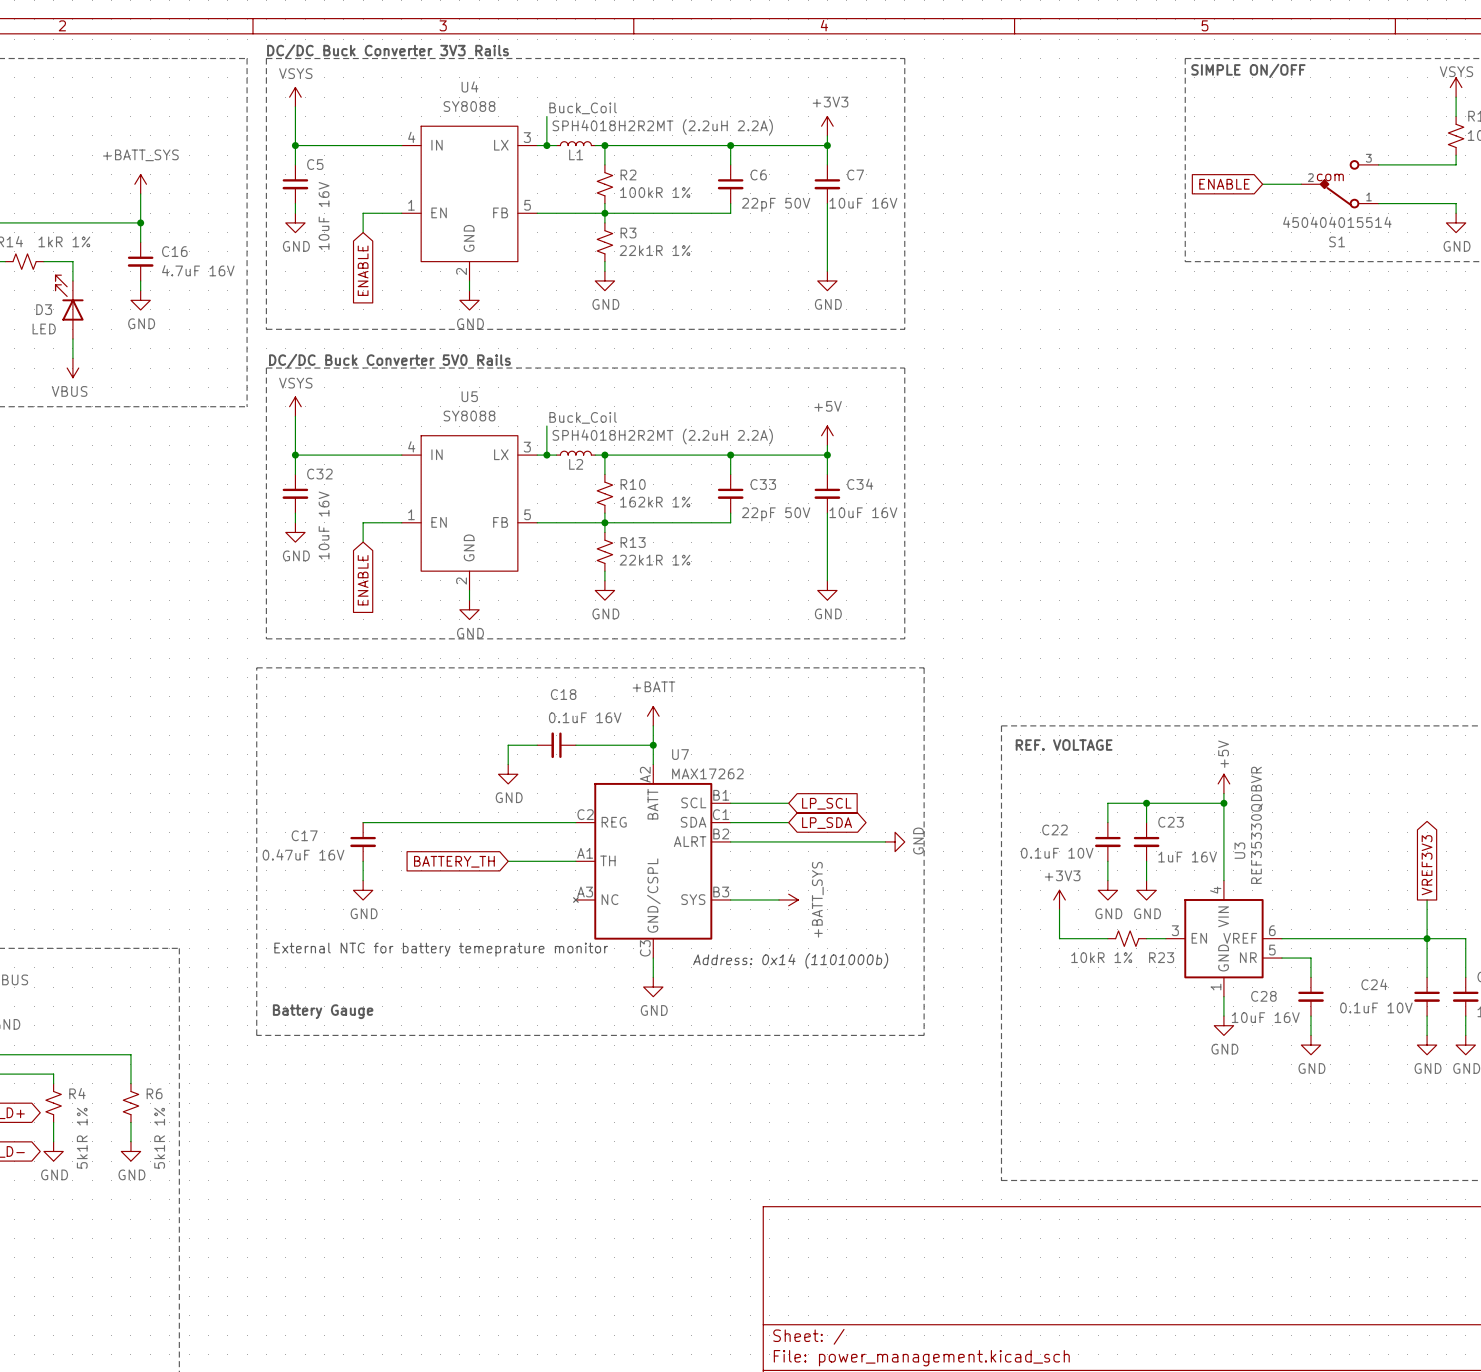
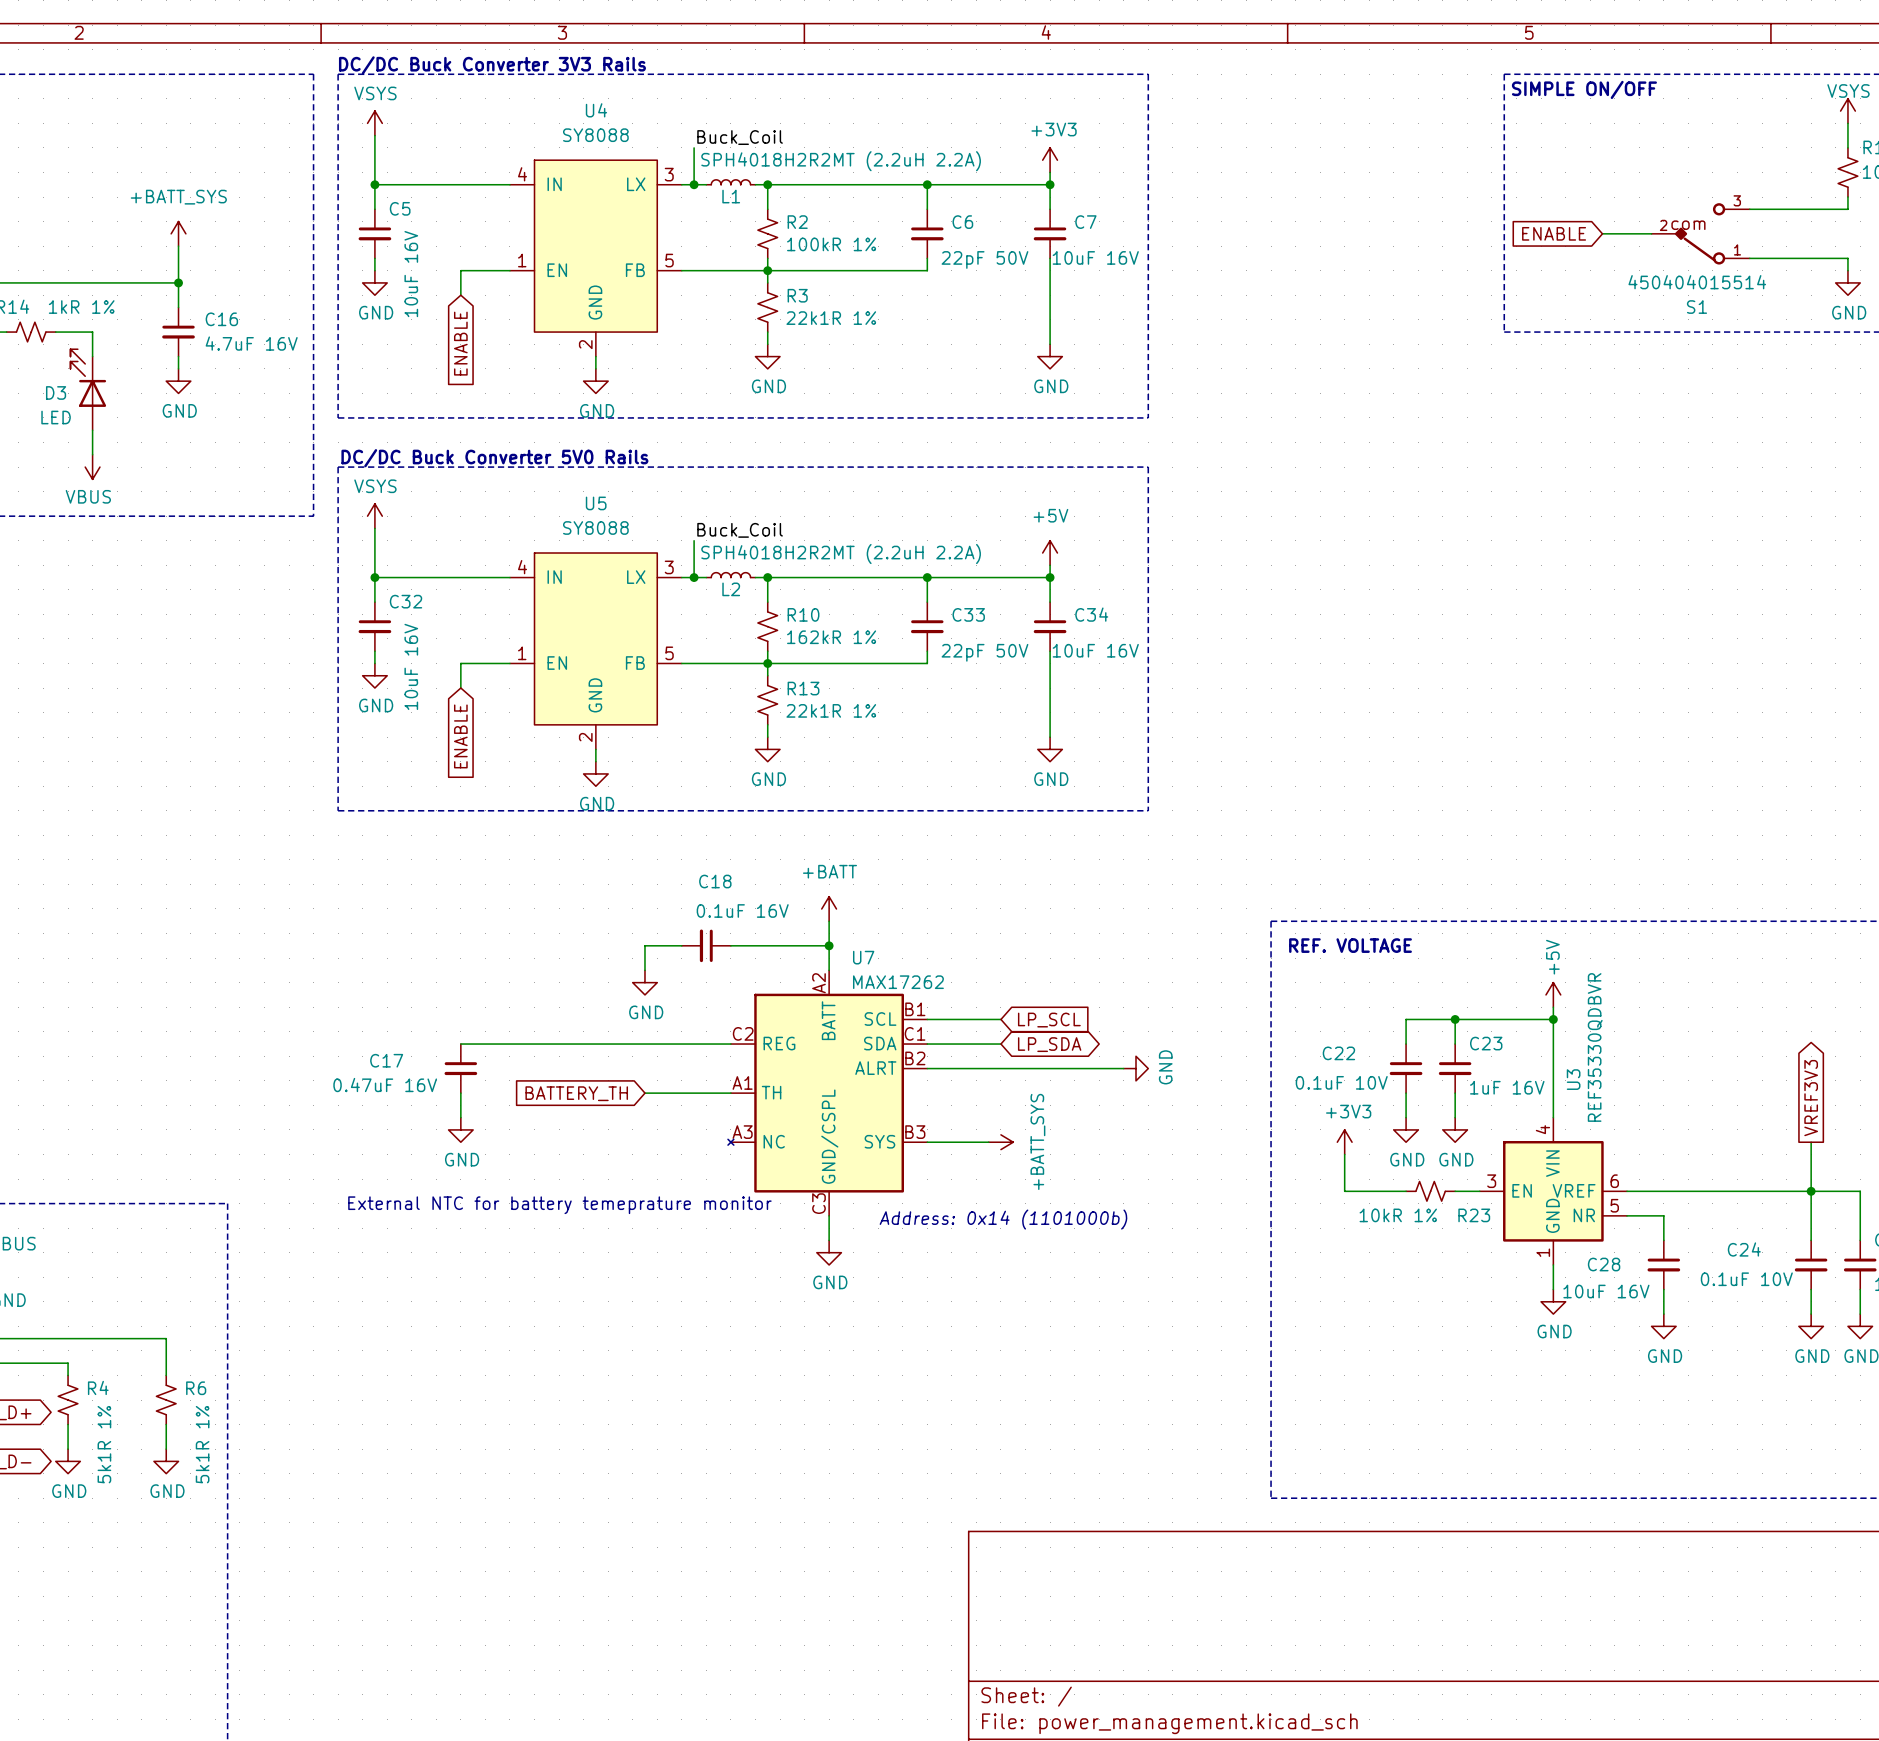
line: (256, 667) (924, 667) (924, 1035) (256, 1035) (256, 667) -> none
text: Battery Gauge (323, 1011) -> none

